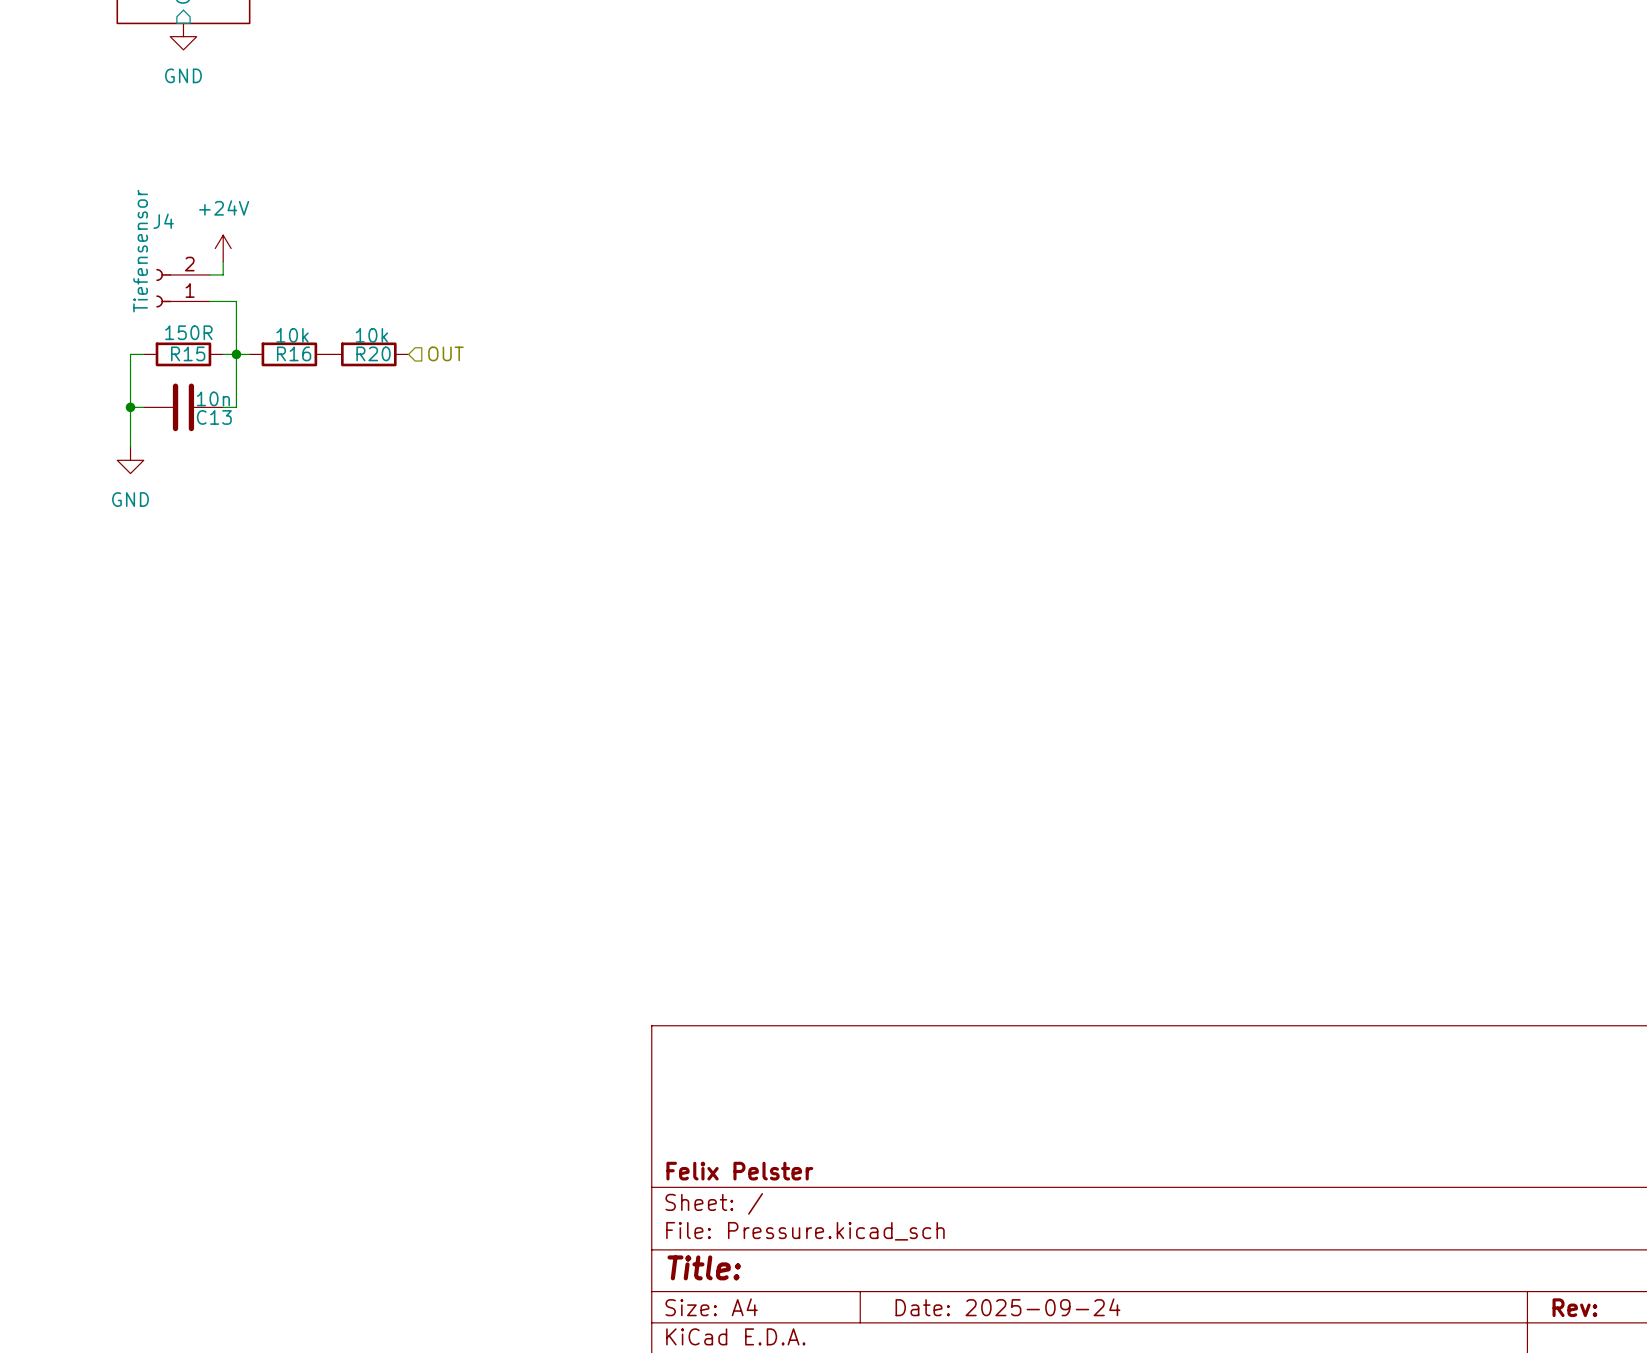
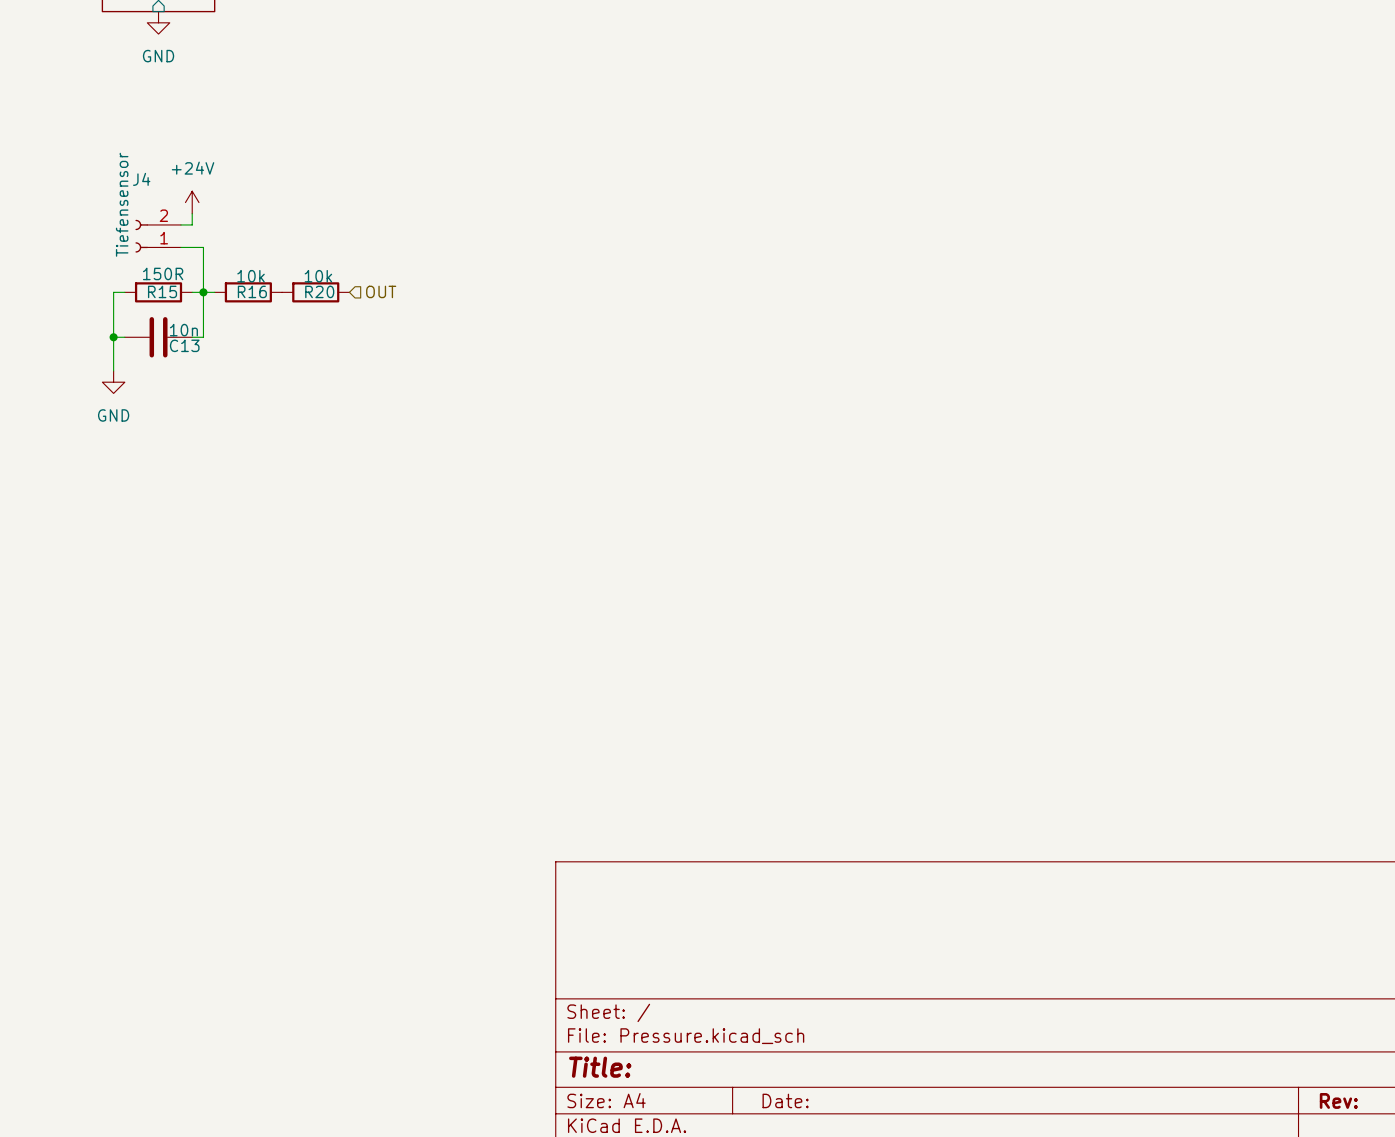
title block: Felix Pelster (739, 1171) -> none
title block: Date: 2025-09-24 (1007, 1307) -> Date: (785, 1100)

